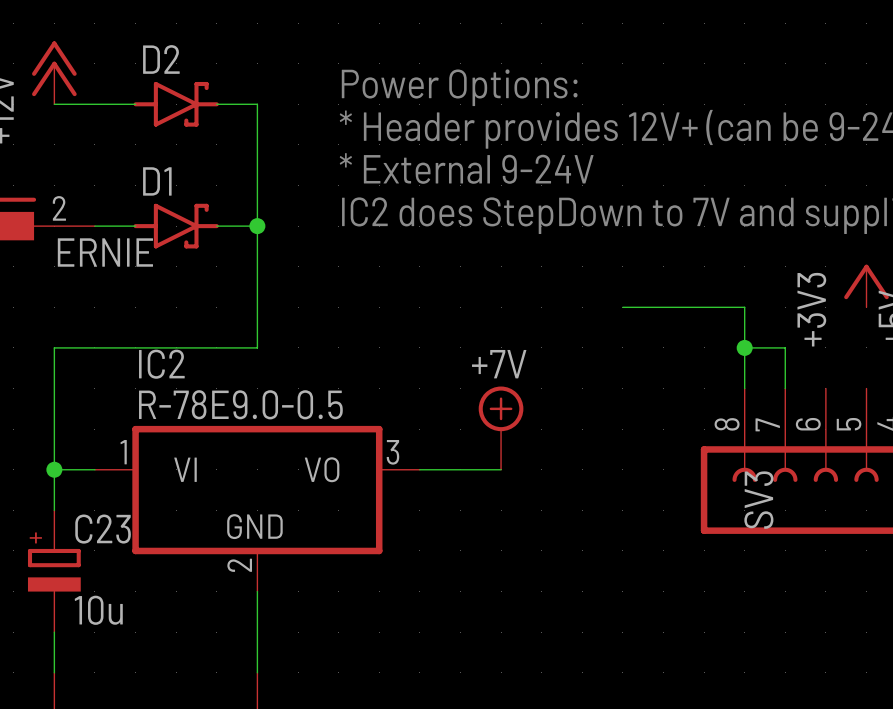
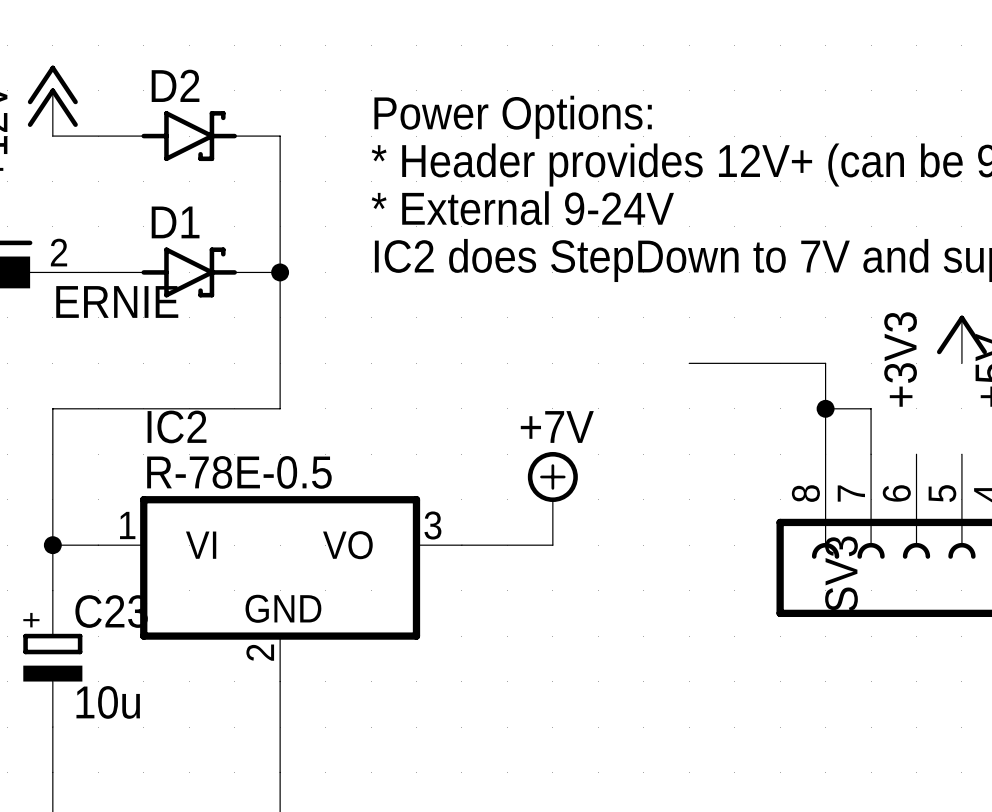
IC2 value: R-78E9.0-0.5 (240, 404) -> R-78E-0.5 (239, 472)

